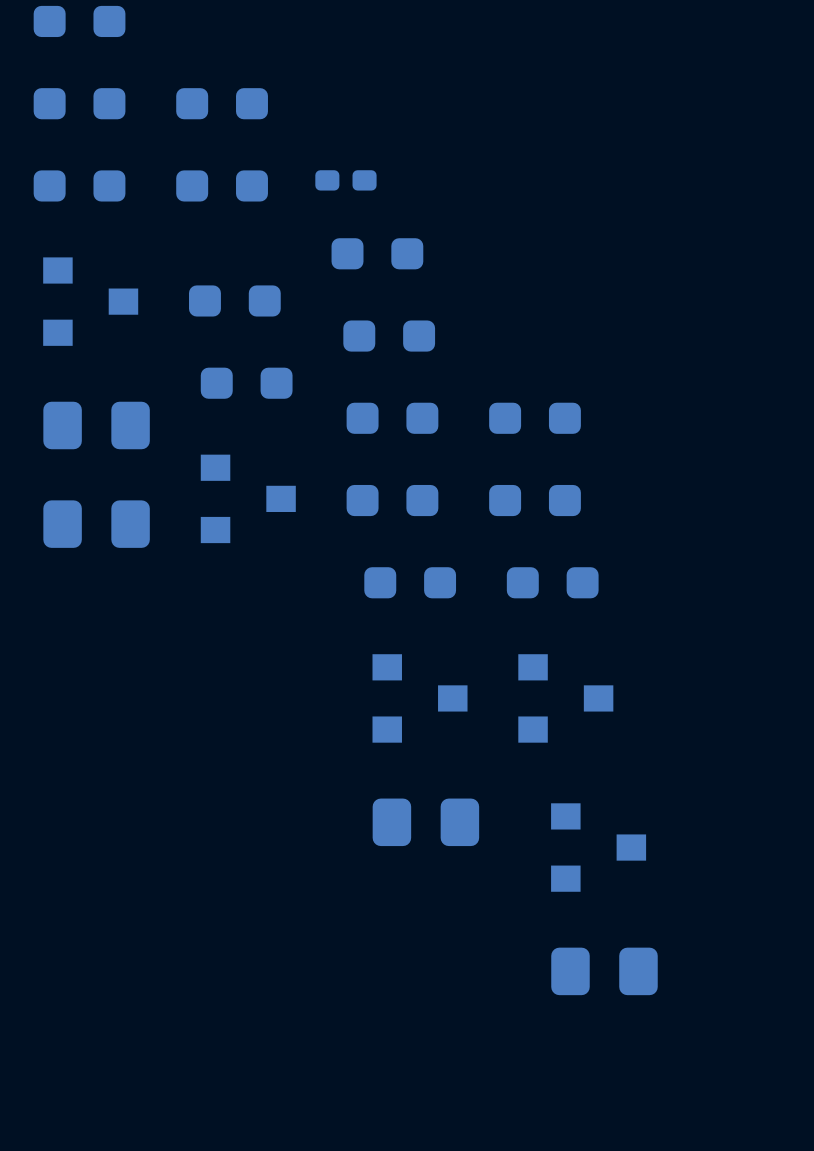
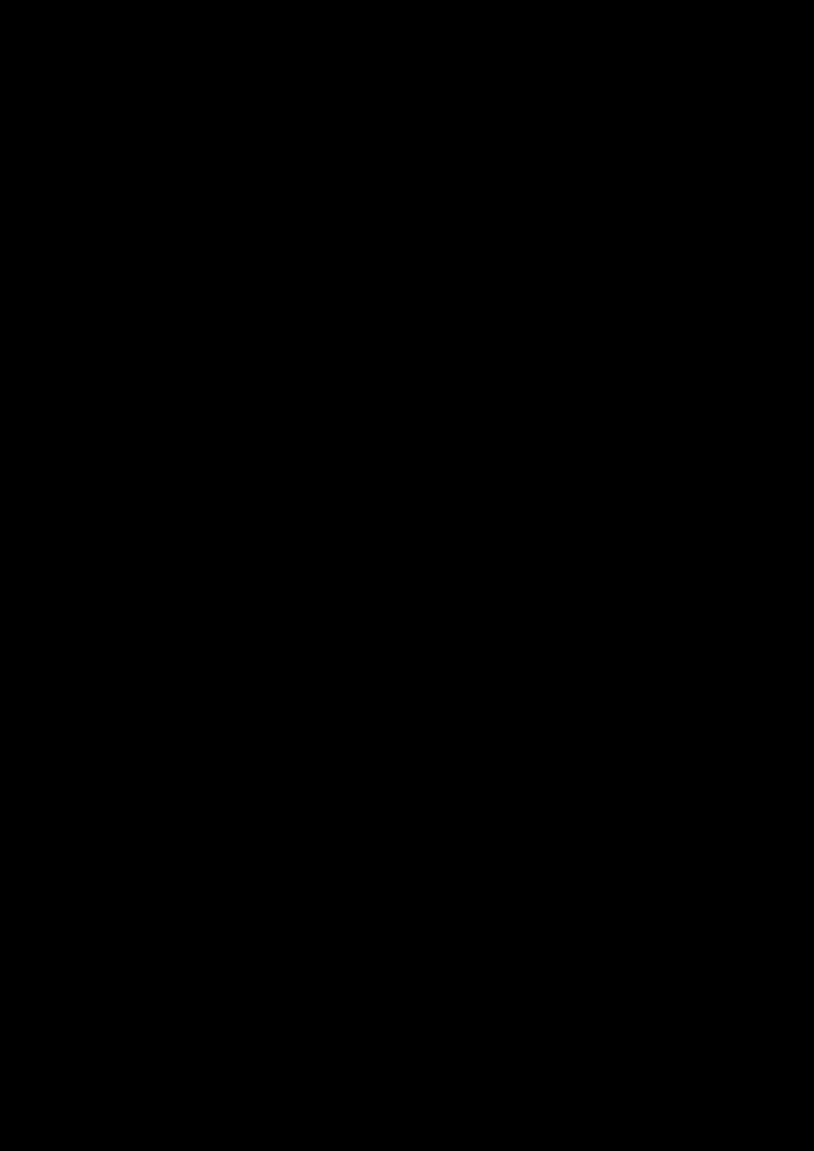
part: (79, 21) -> none
part: (79, 103) -> none
part: (222, 103) -> none
part: (345, 180) -> none
part: (79, 185) -> none
part: (222, 185) -> none
part: (377, 253) -> none
part: (234, 300) -> none
part: (90, 301) -> none
part: (389, 336) -> none
part: (246, 383) -> none
part: (392, 418) -> none
part: (535, 418) -> none
part: (96, 425) -> none
part: (248, 498) -> none
part: (392, 500) -> none
part: (535, 500) -> none
part: (96, 524) -> none
part: (410, 582) -> none
part: (552, 582) -> none
part: (420, 698) -> none
part: (565, 698) -> none
part: (425, 822) -> none
part: (598, 847) -> none
part: (604, 971) -> none

